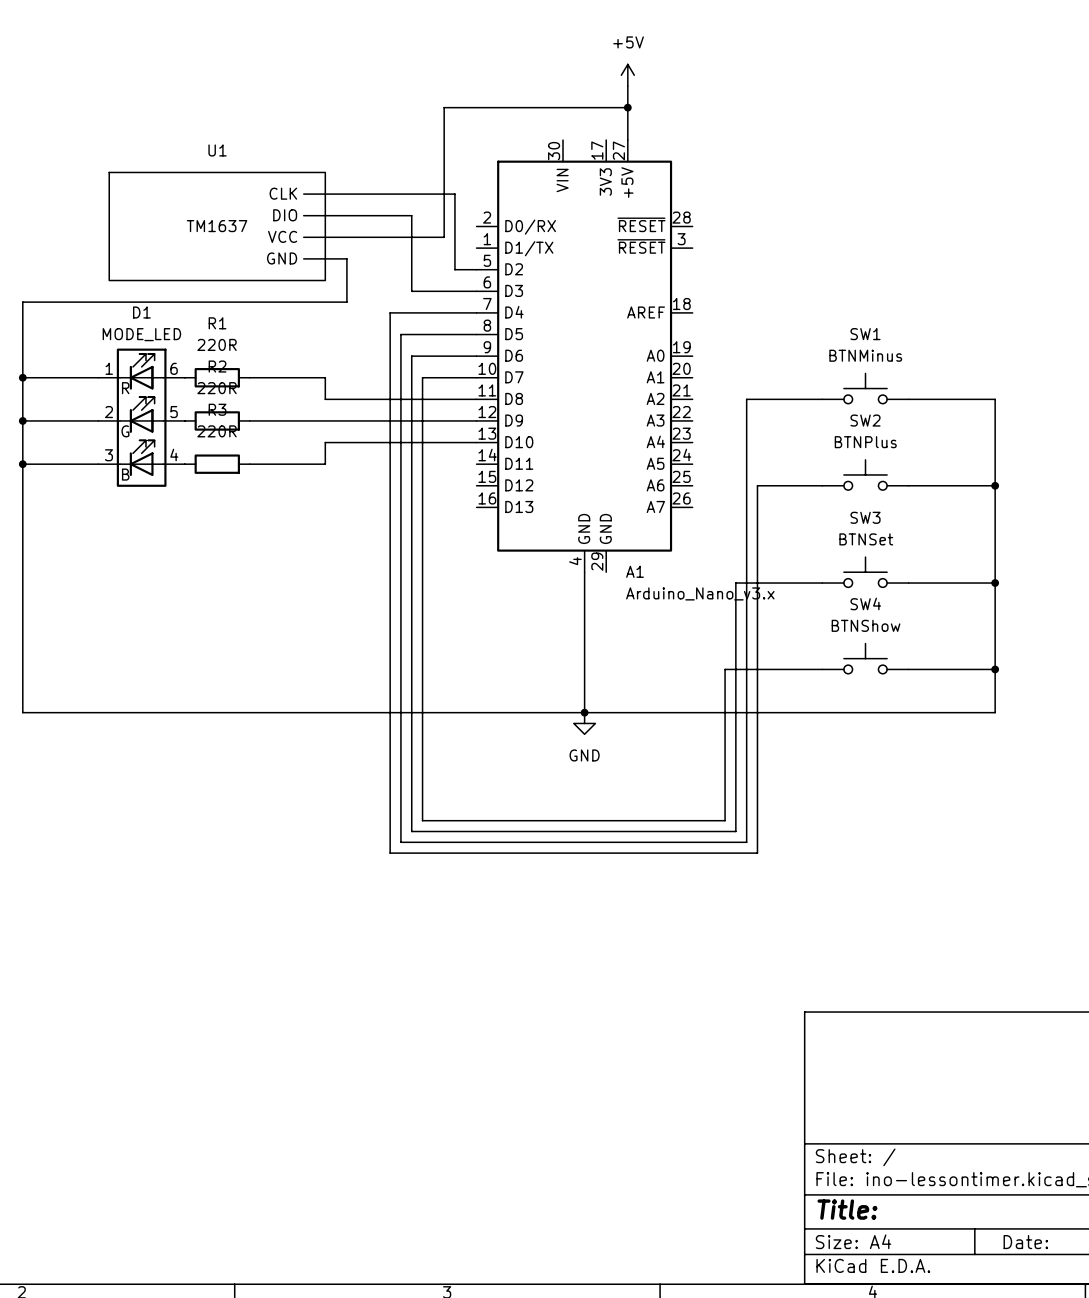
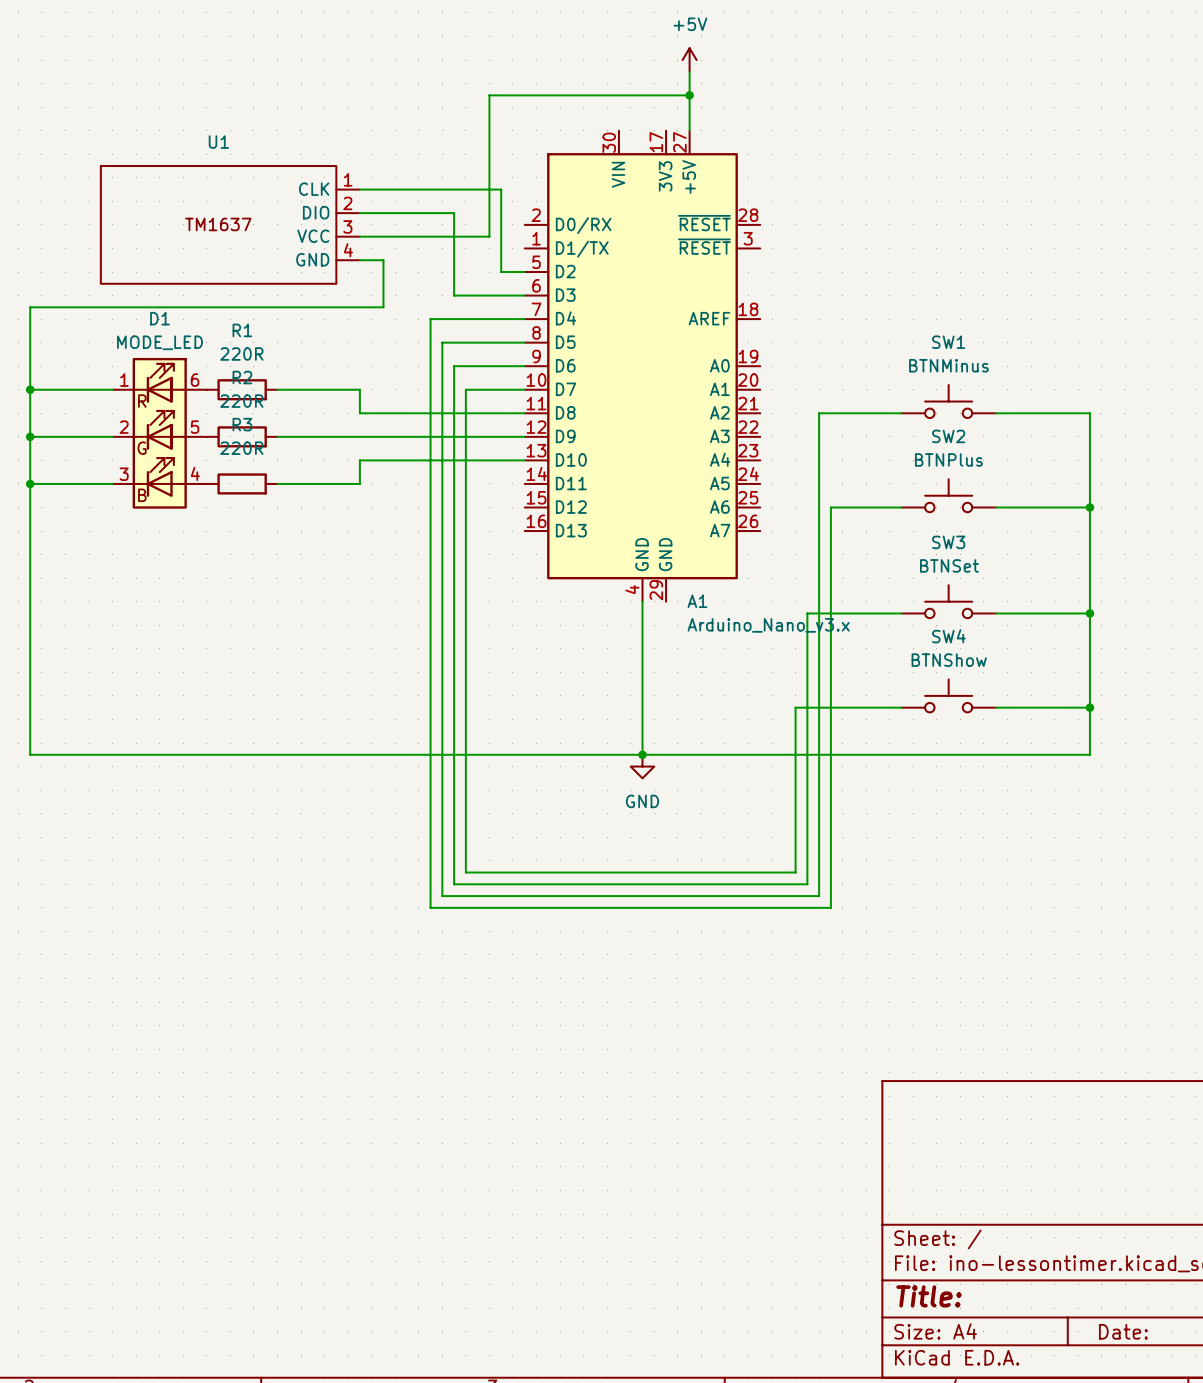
U1 symbol: [109, 172, 326, 281] -> [100, 166, 360, 284]

